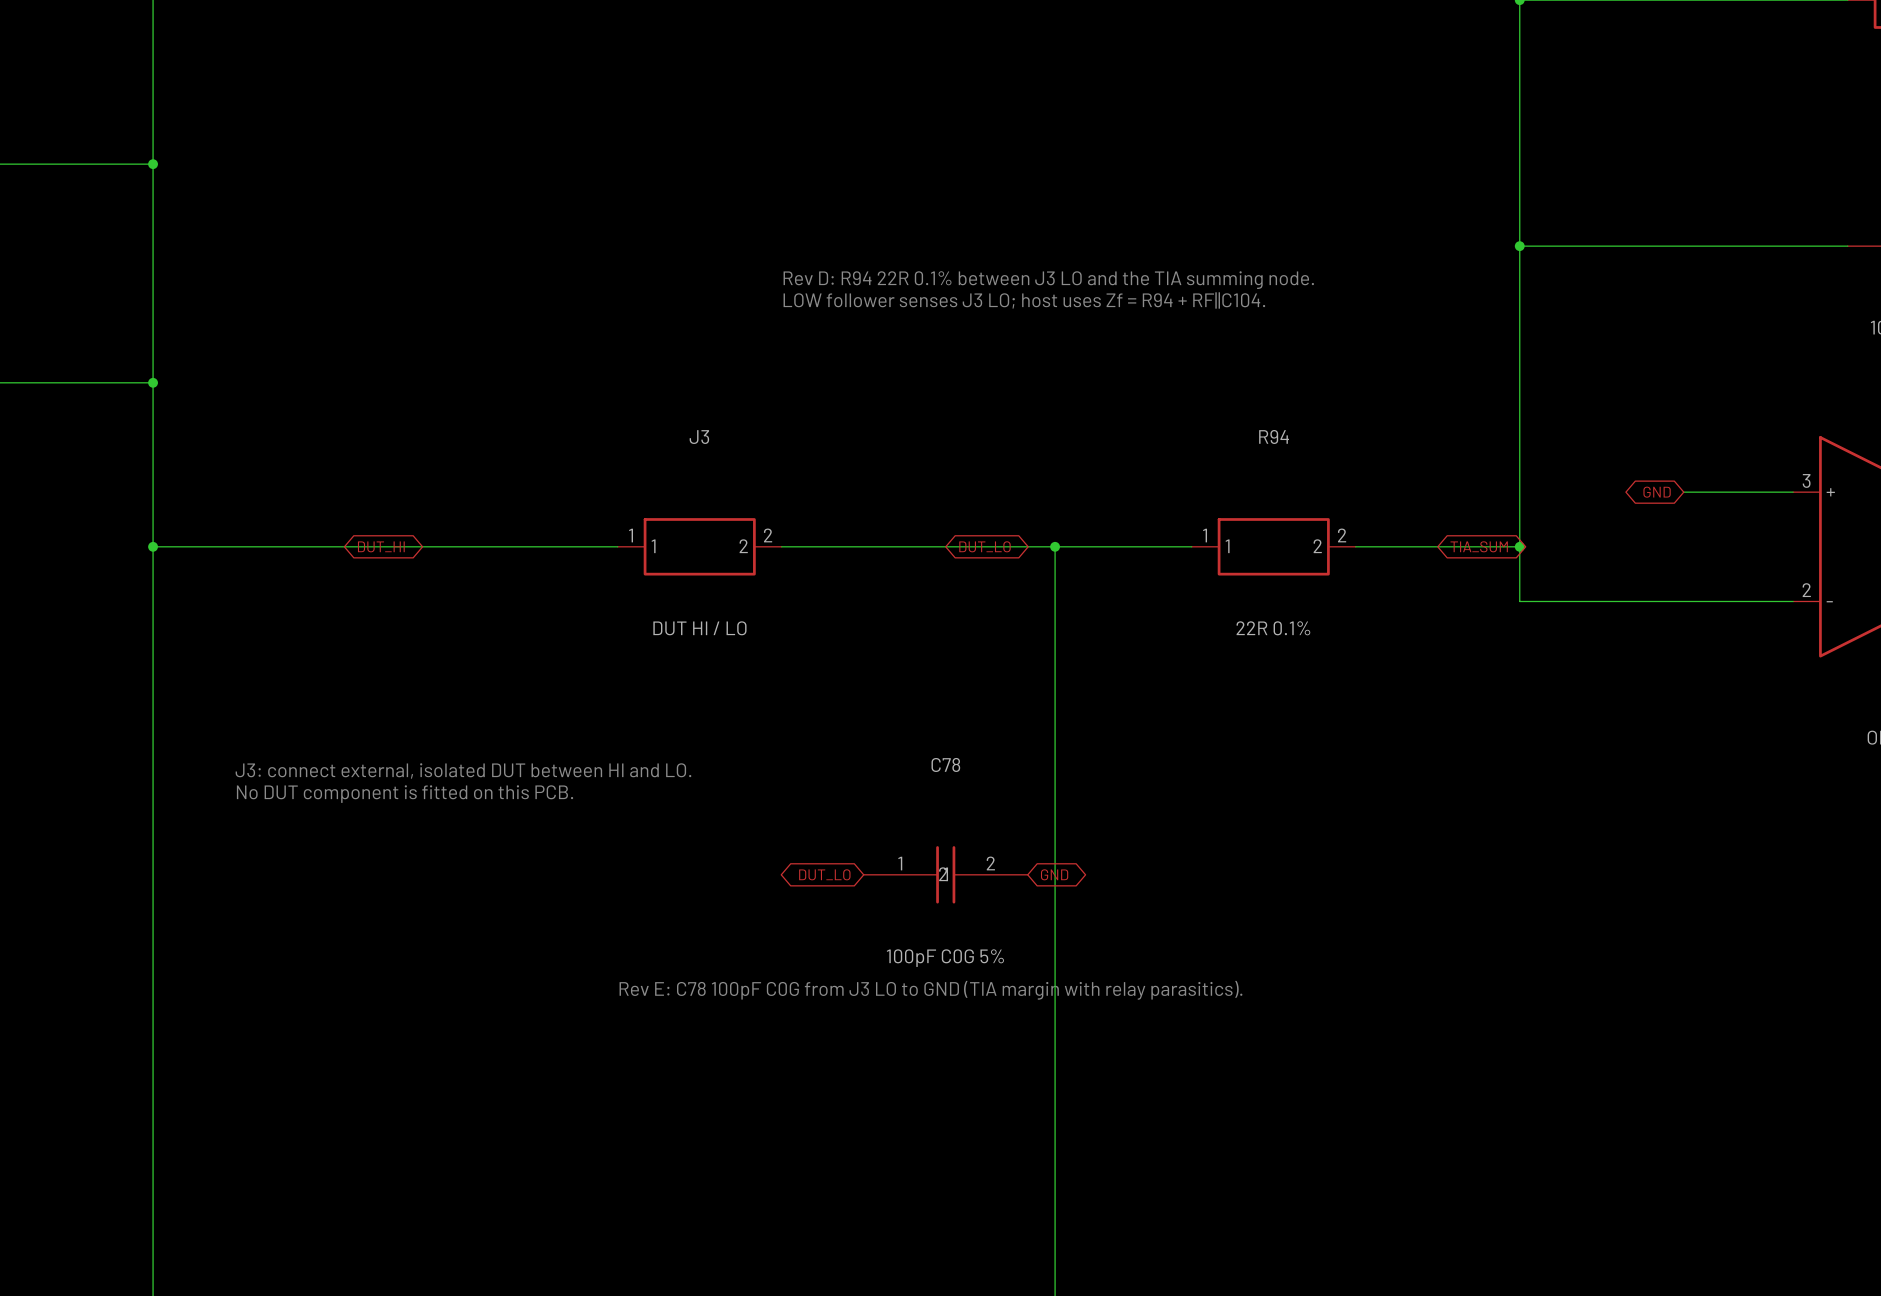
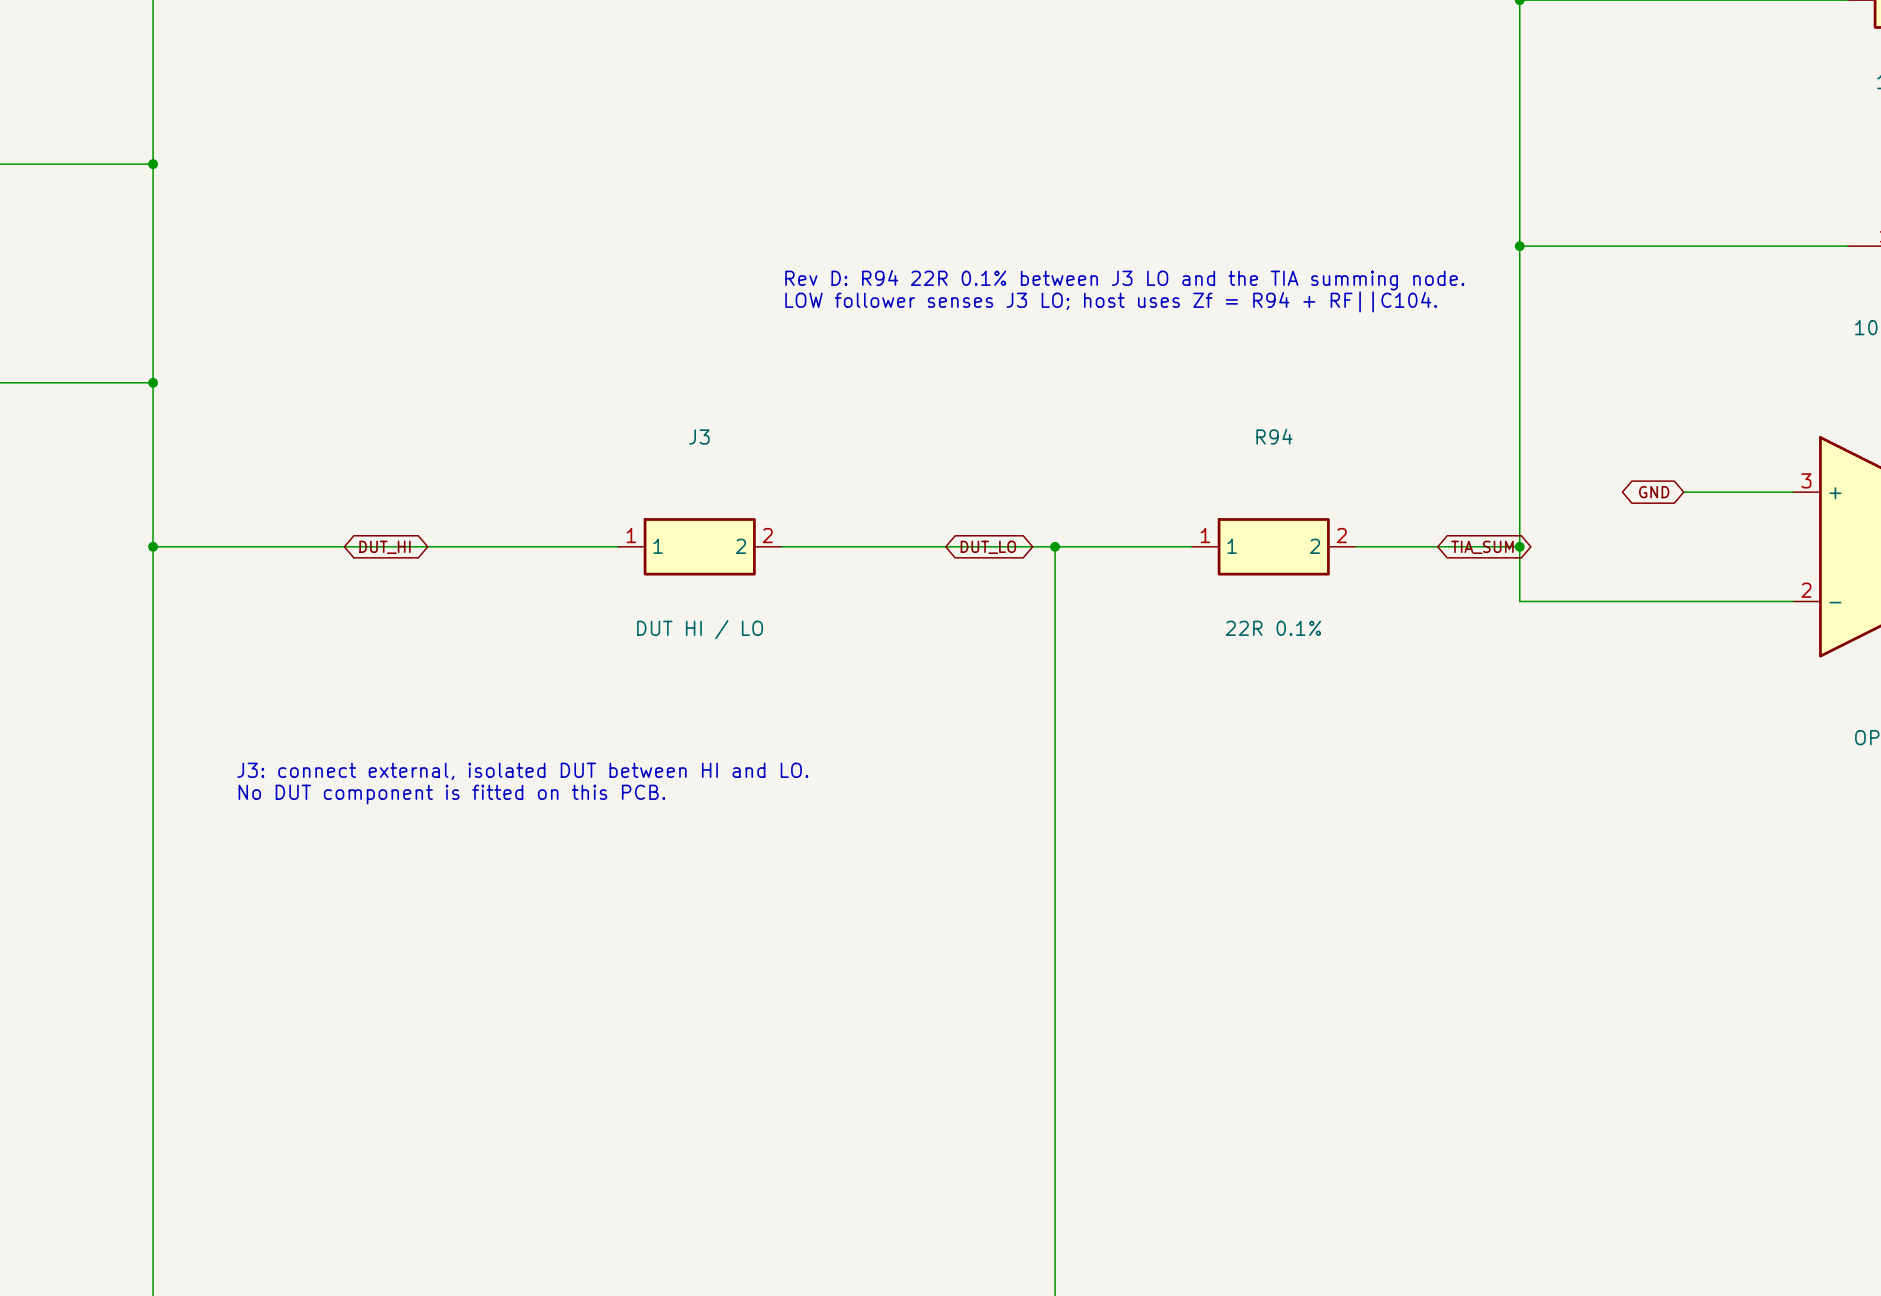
global label: DUT_LO (824, 874) -> none
C78: 100pF C0G 5% (945, 874) -> none
global label: GND (1054, 874) -> none
text: Rev E: C78 100pF C0G from J3 LO to GND (TIA margin with relay parasitics). (930, 990) -> none

